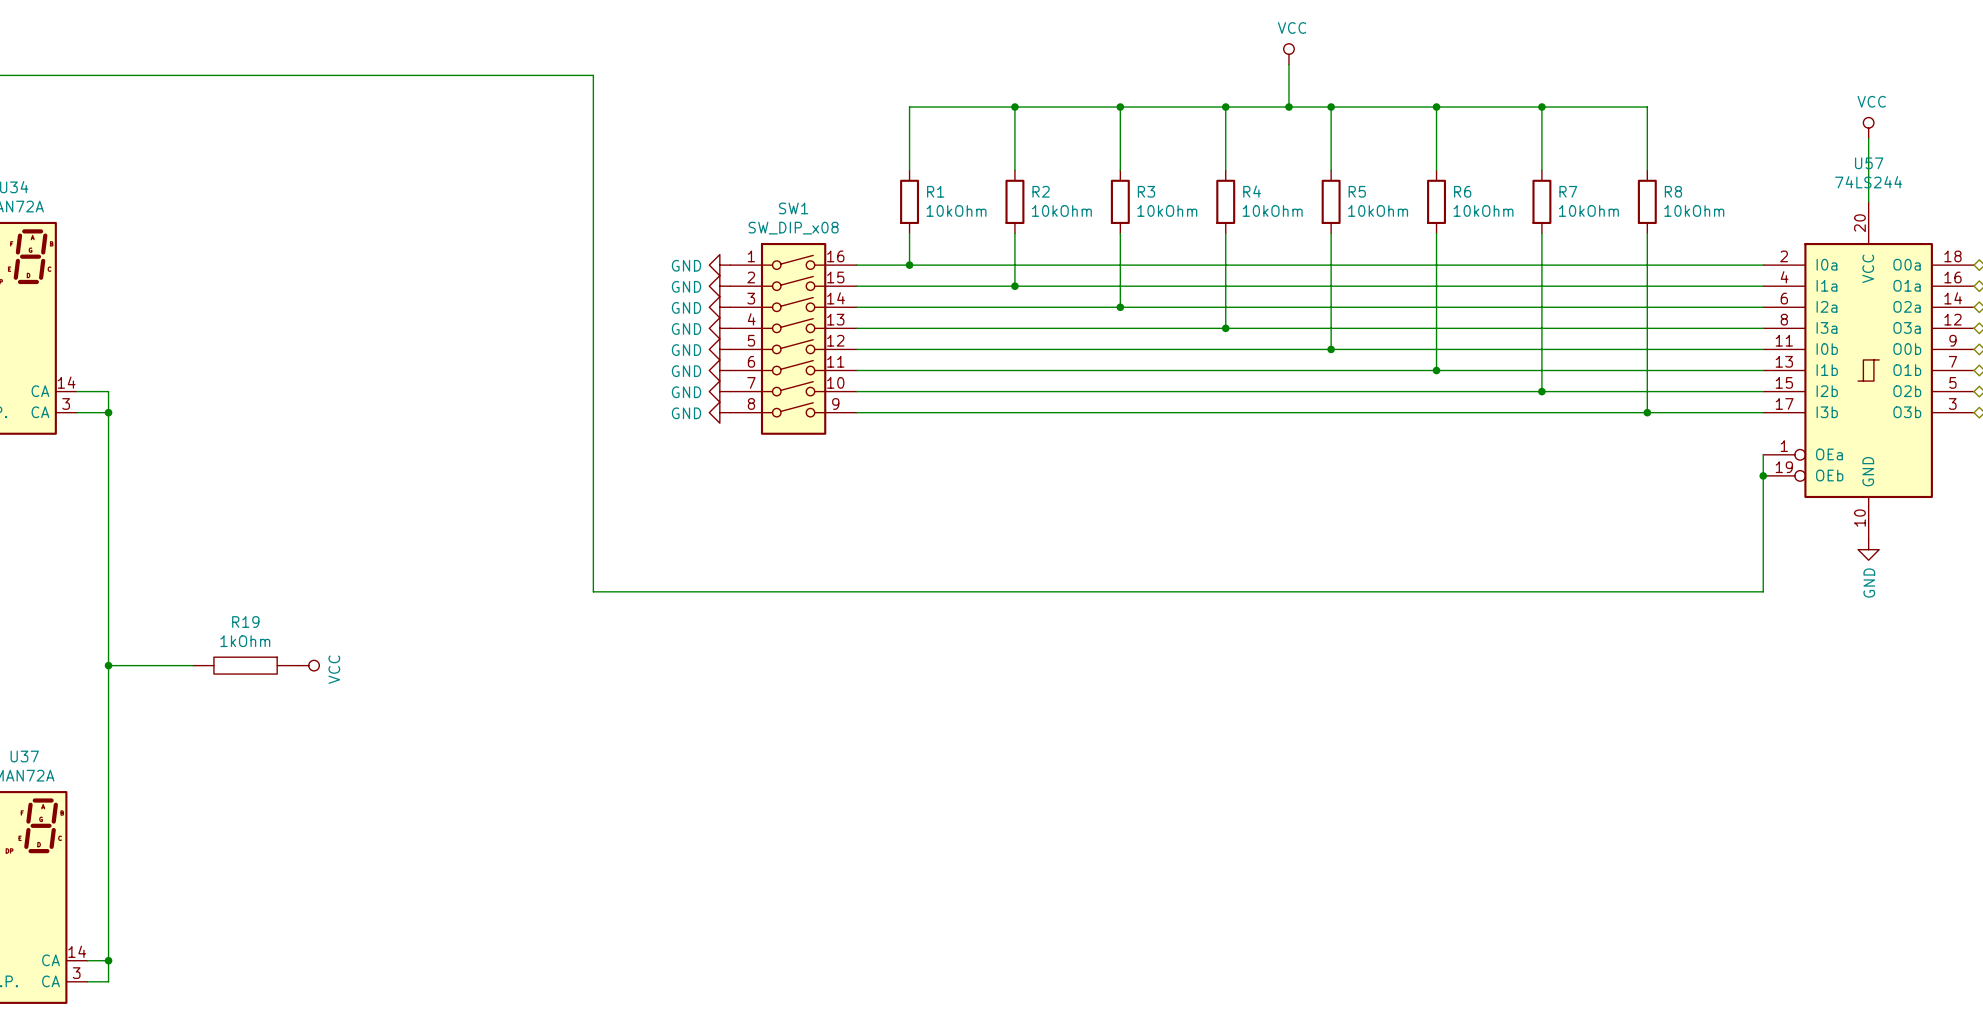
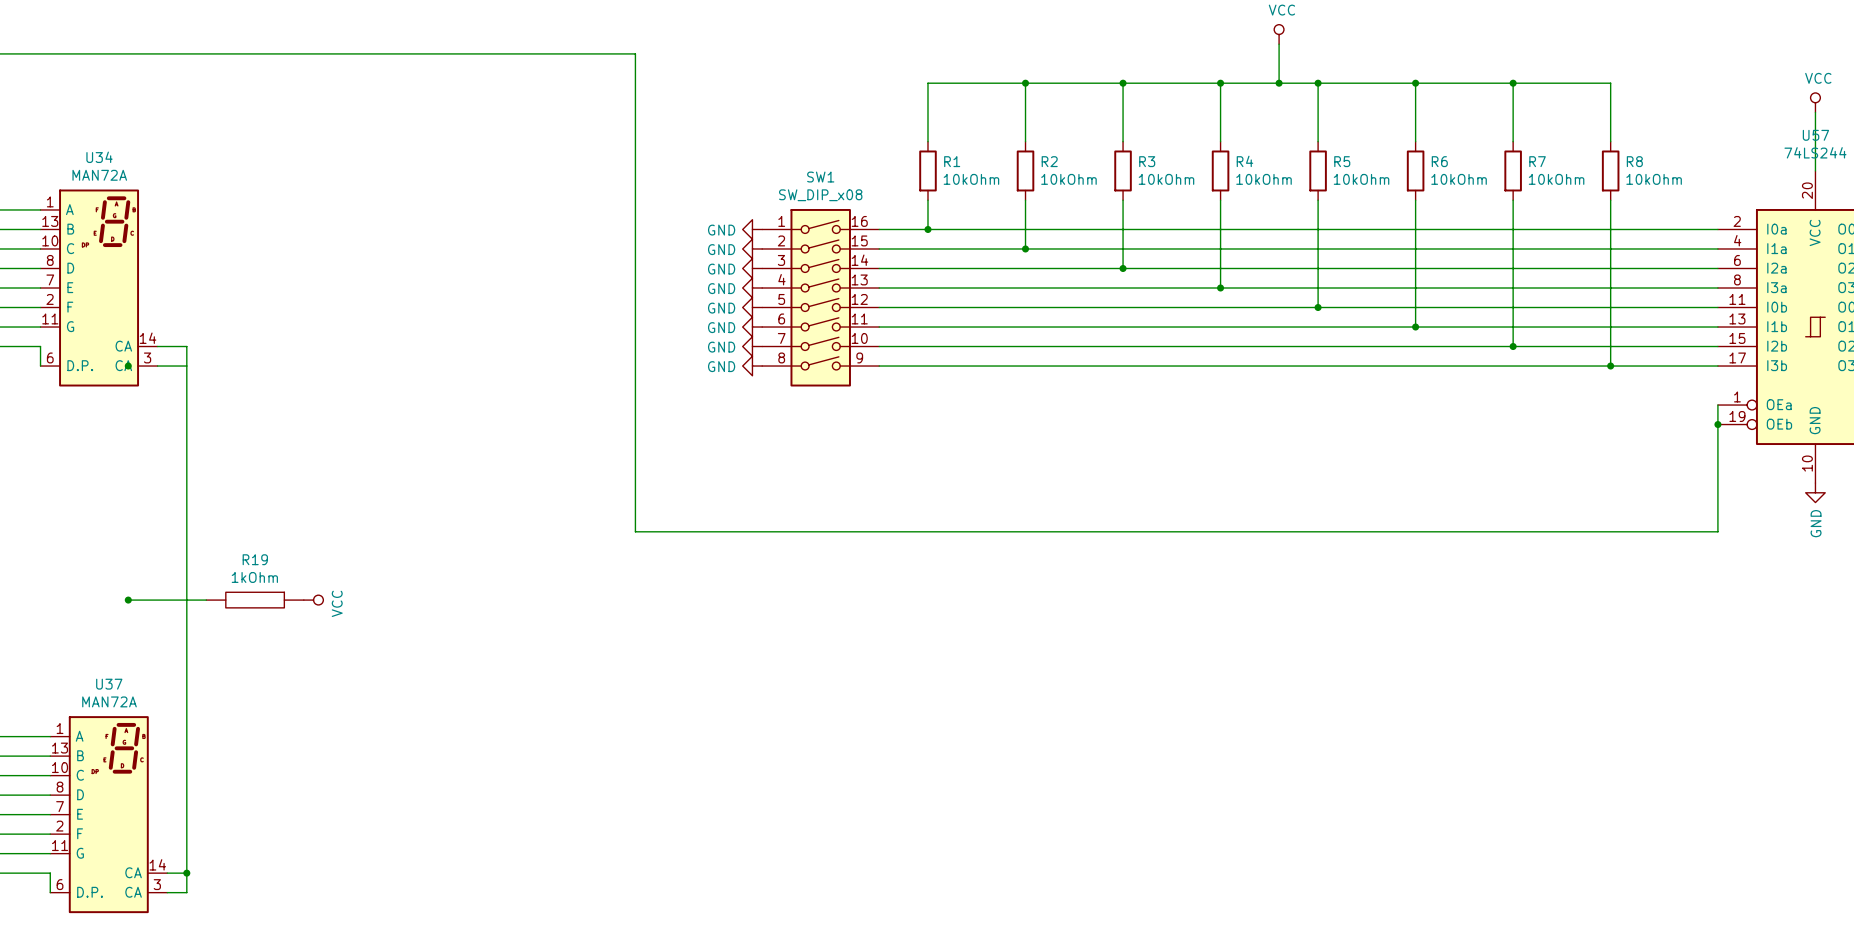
junction: none -> (128, 366)
junction: (108, 412) -> none
junction: none -> (128, 600)
junction: (108, 665) -> none
wire: (129, 665) (192, 665) -> (128, 600) (186, 600)
R19 position: (245, 665) -> (255, 600)
power symbol position: VCC (308, 665) -> VCC (313, 600)

